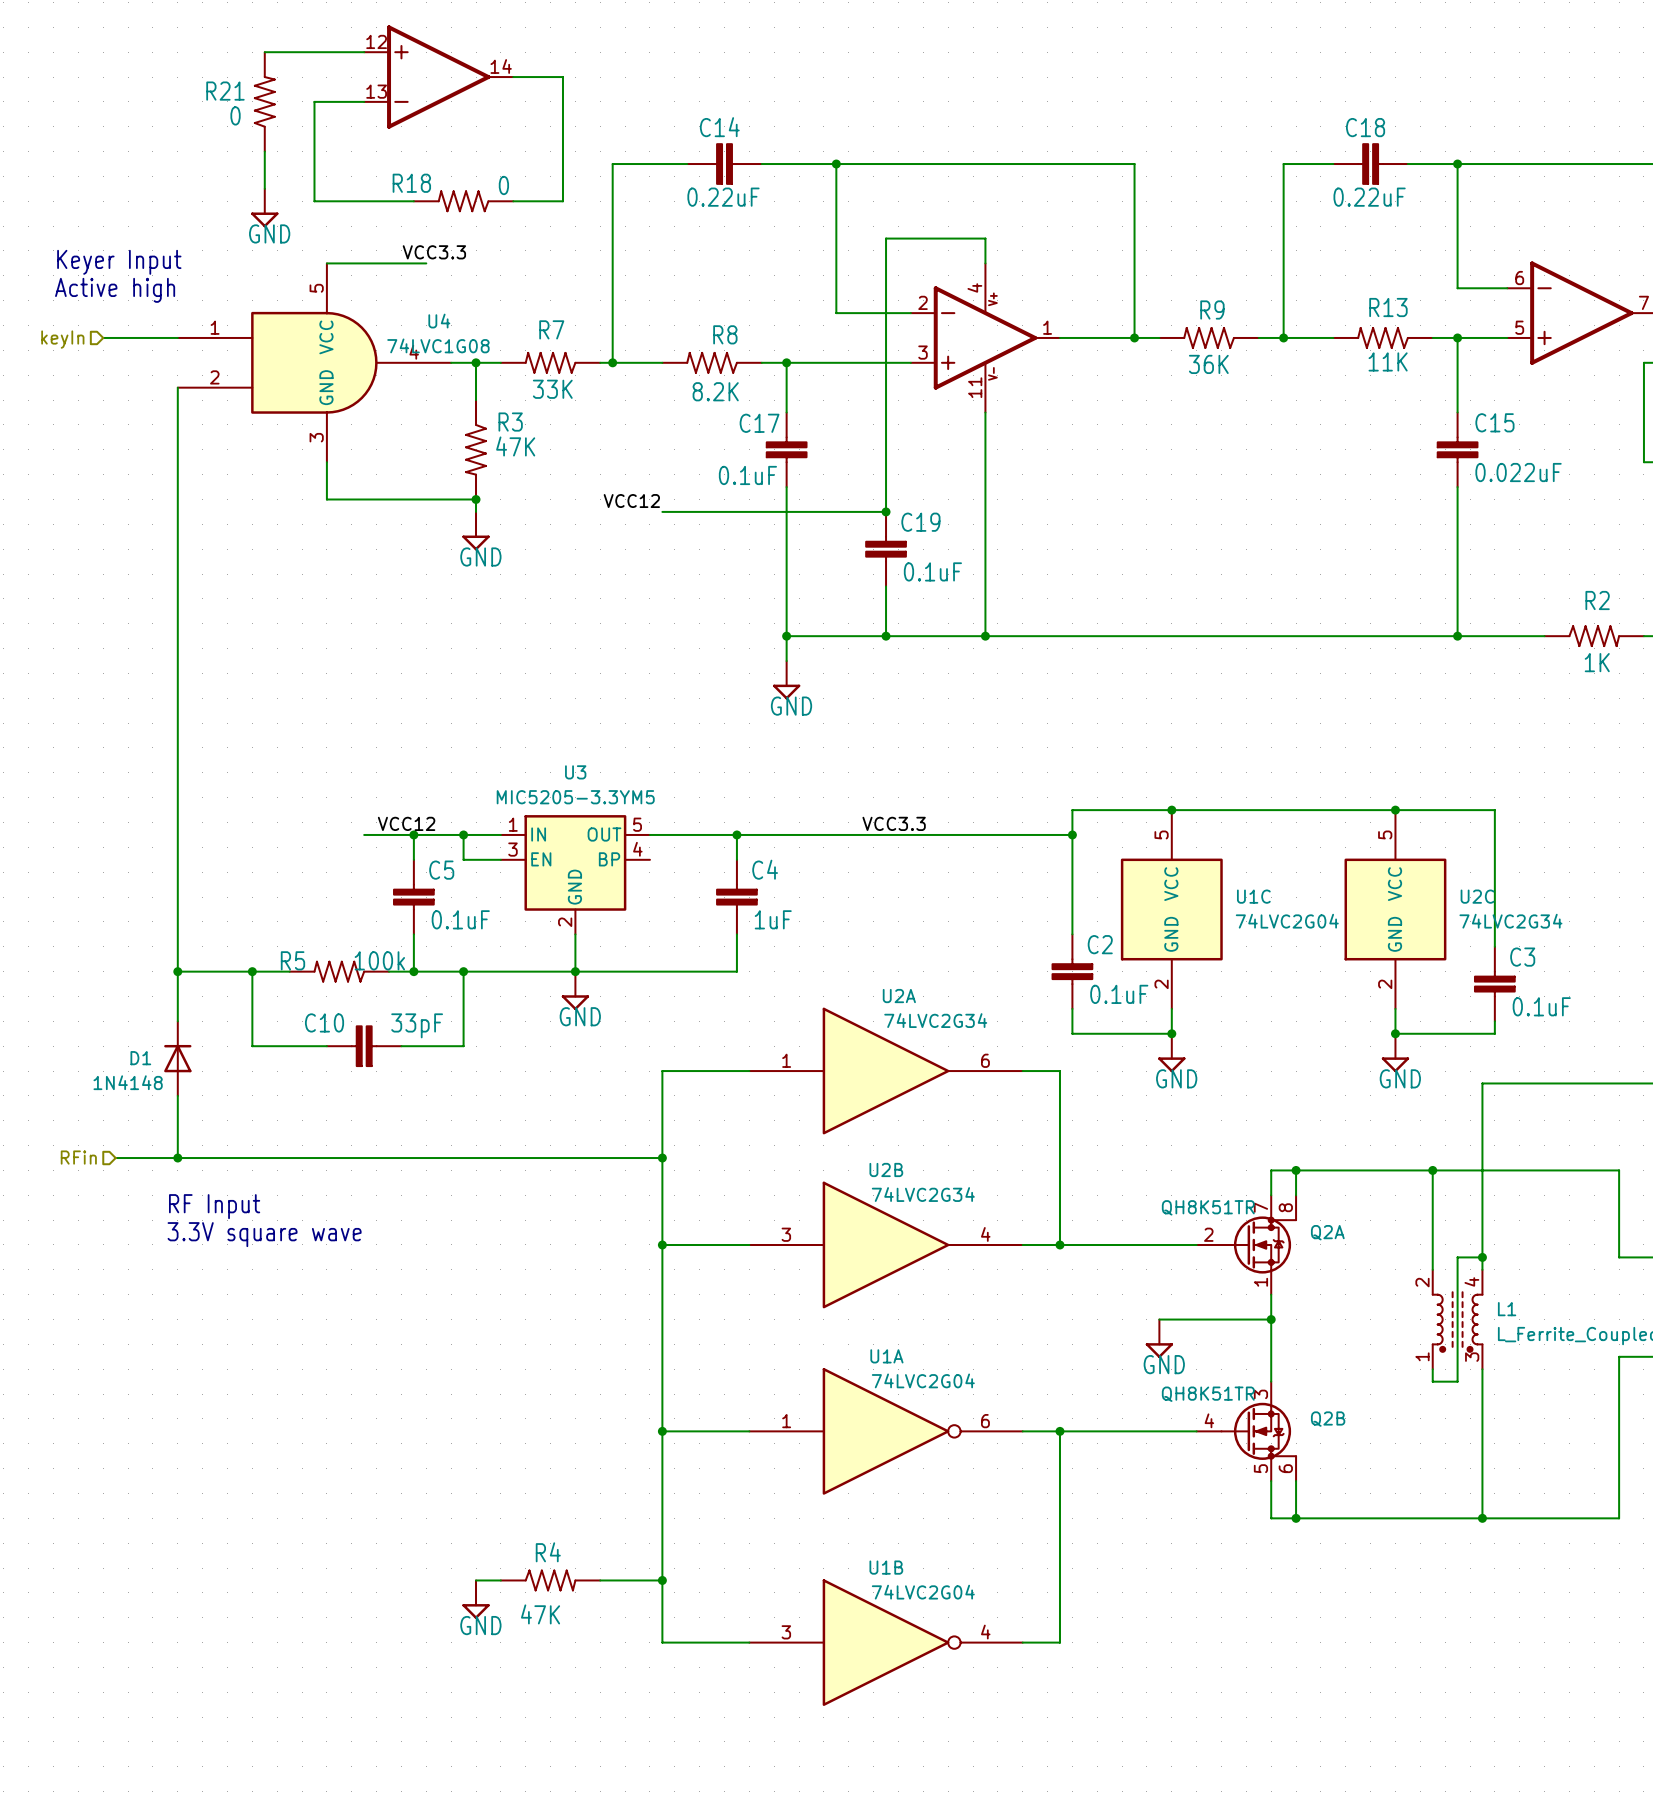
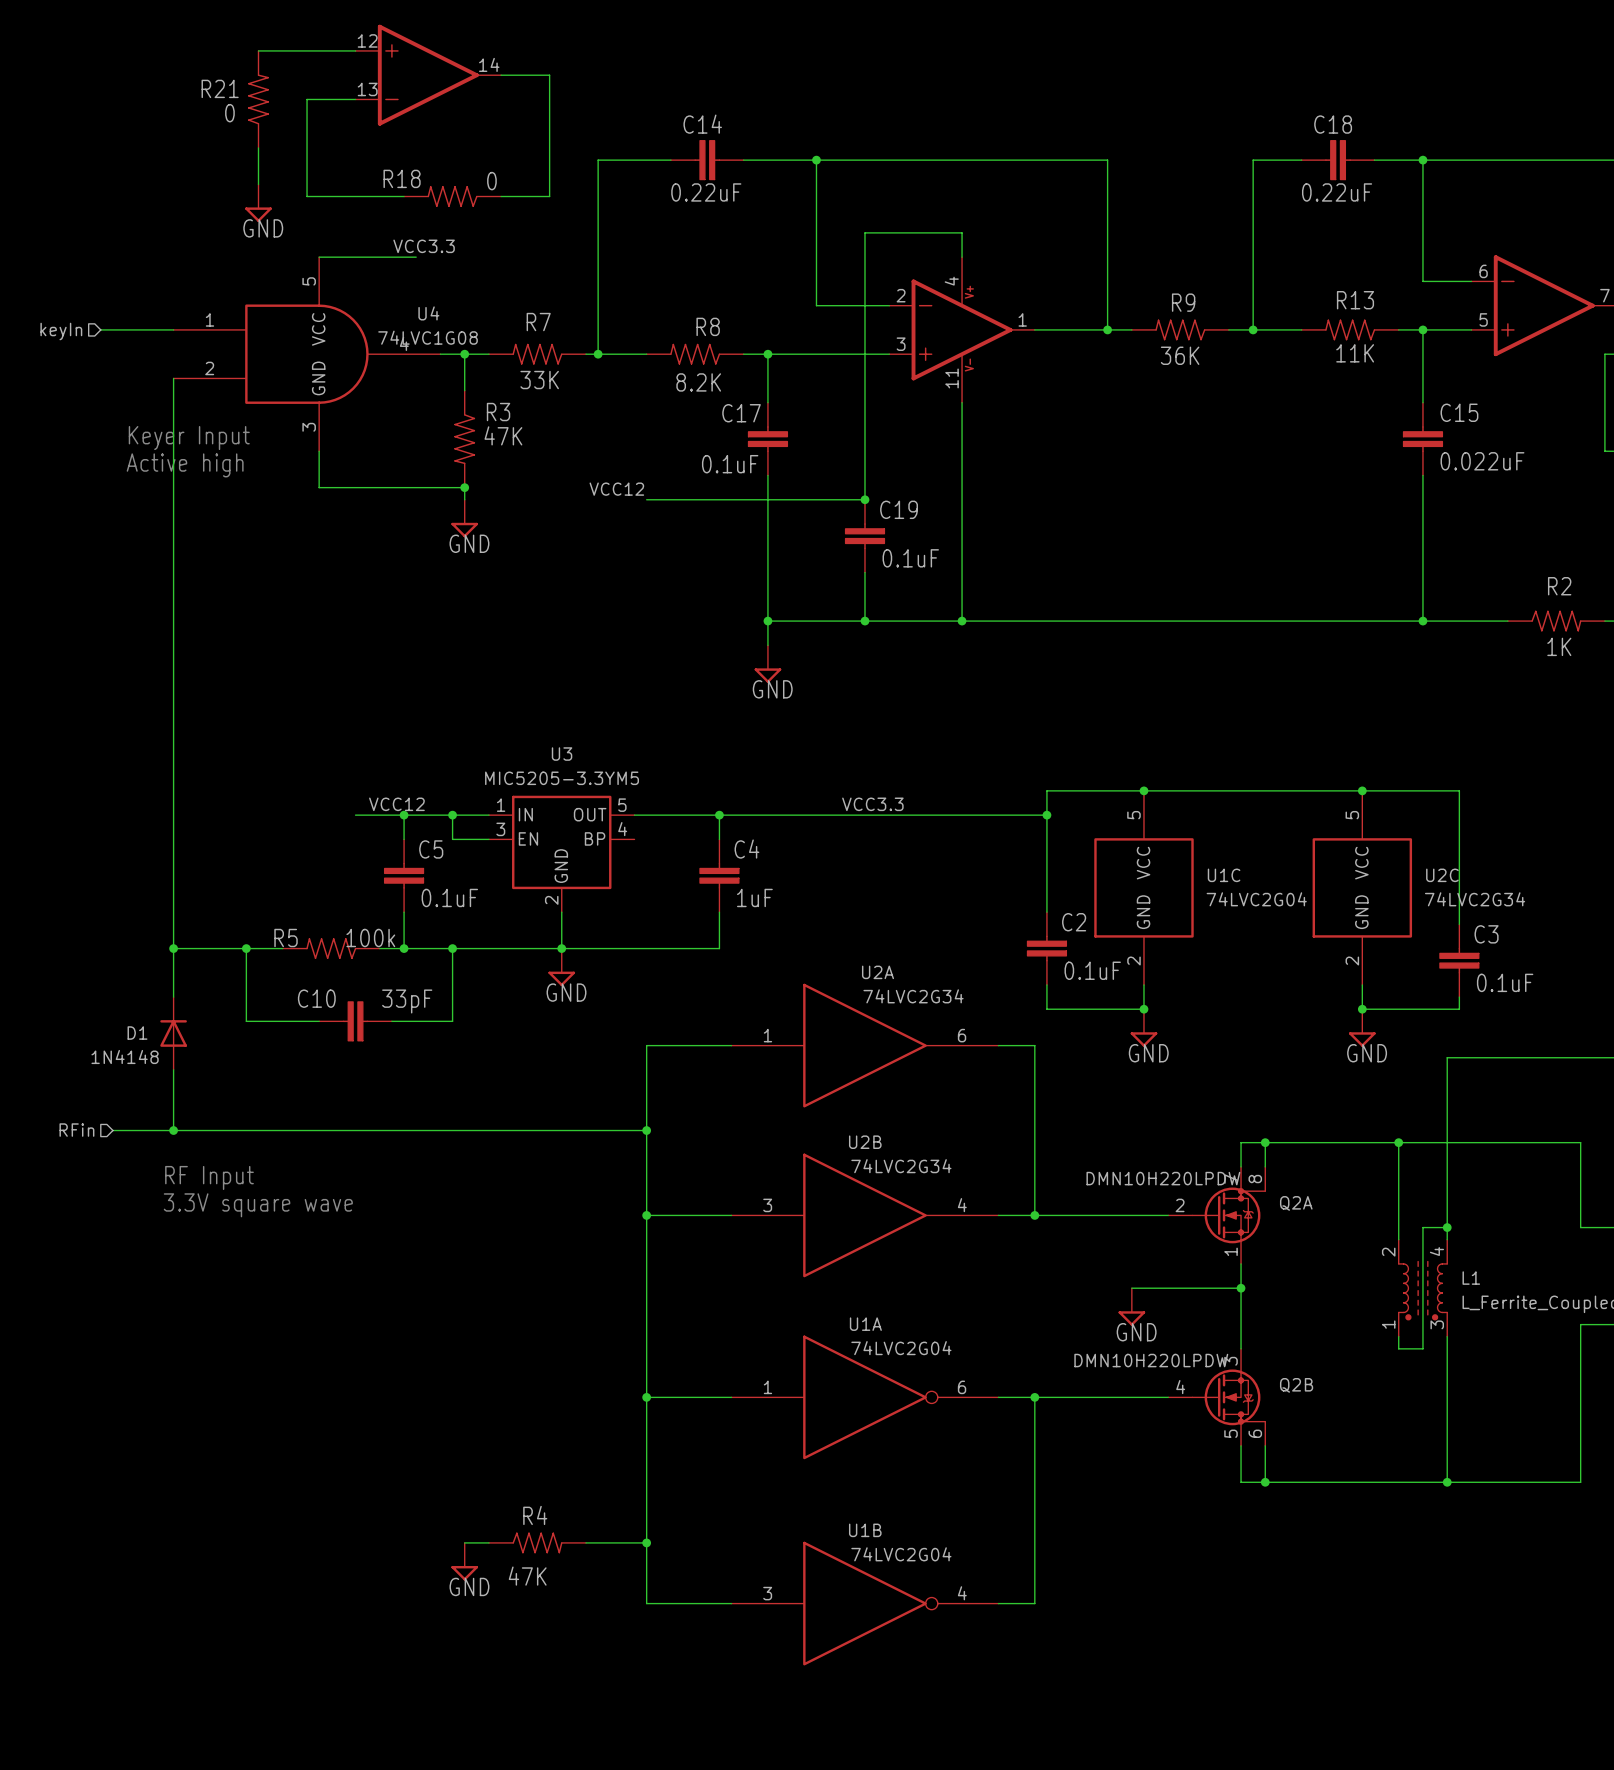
text position: Keyer Input (119, 262) -> Keyer Input (189, 438)
text position: Active high (115, 290) -> Active high (185, 465)
Q2A value: QH8K51TR (1208, 1207) -> DMN10H220LPDW (1163, 1178)
Q2B value: QH8K51TR (1208, 1394) -> DMN10H220LPDW (1151, 1360)

